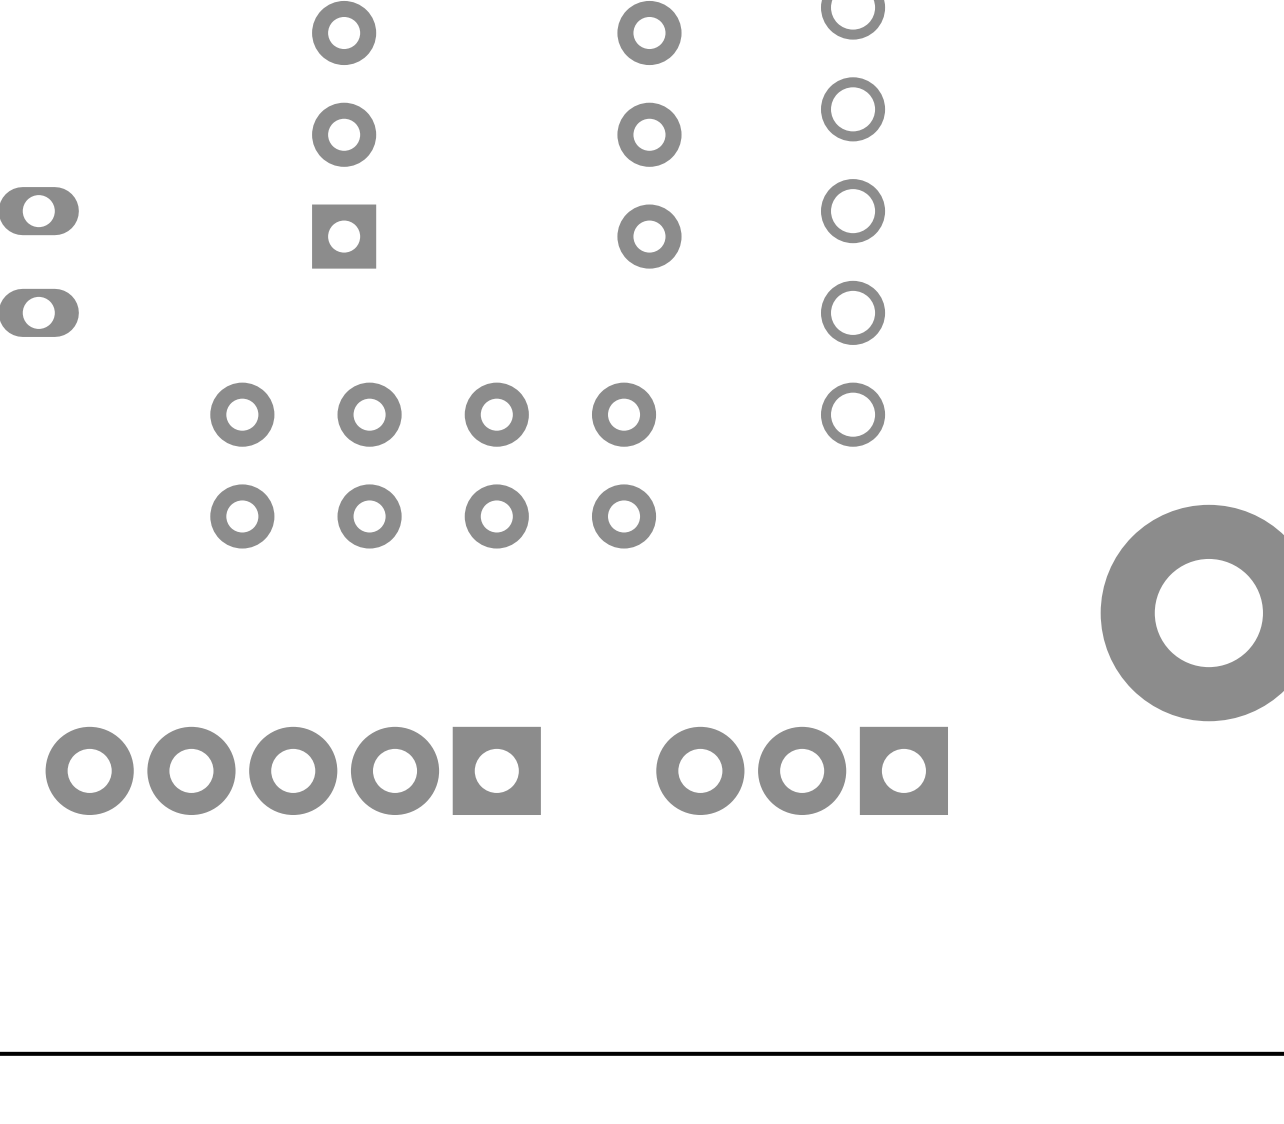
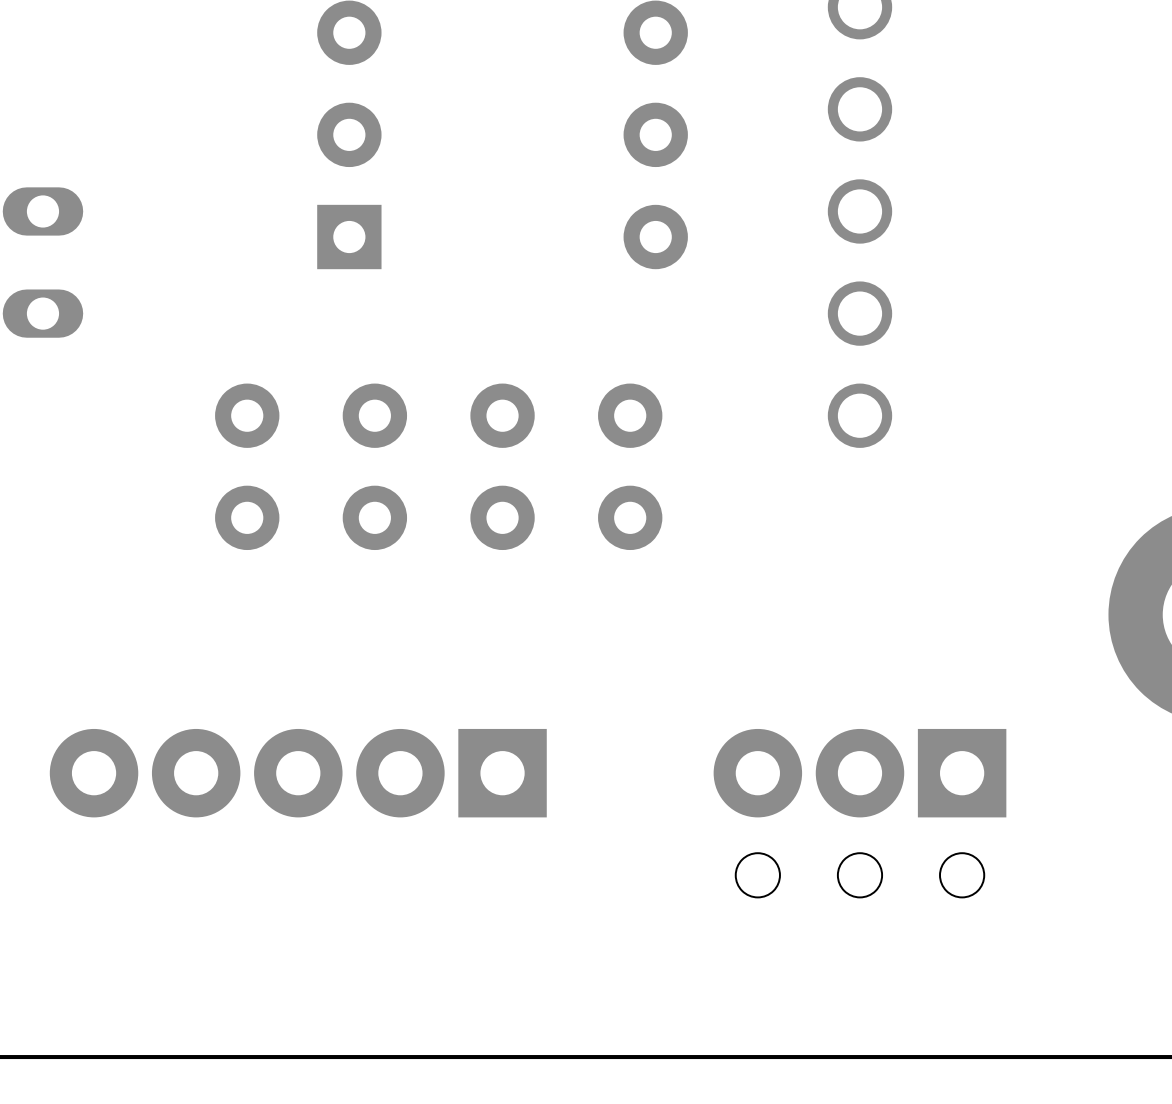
part: (802, 770) -> none
part: none -> (859, 813)

